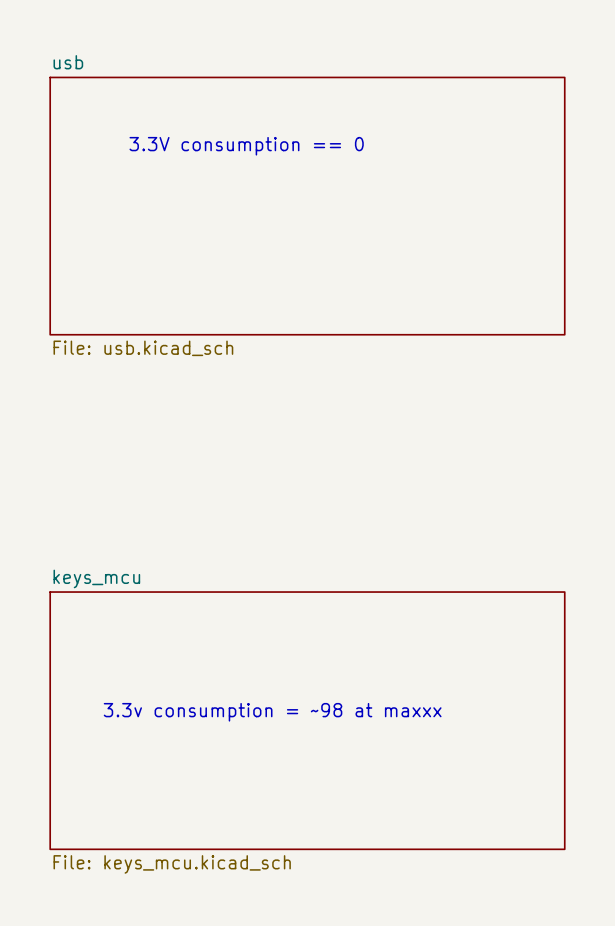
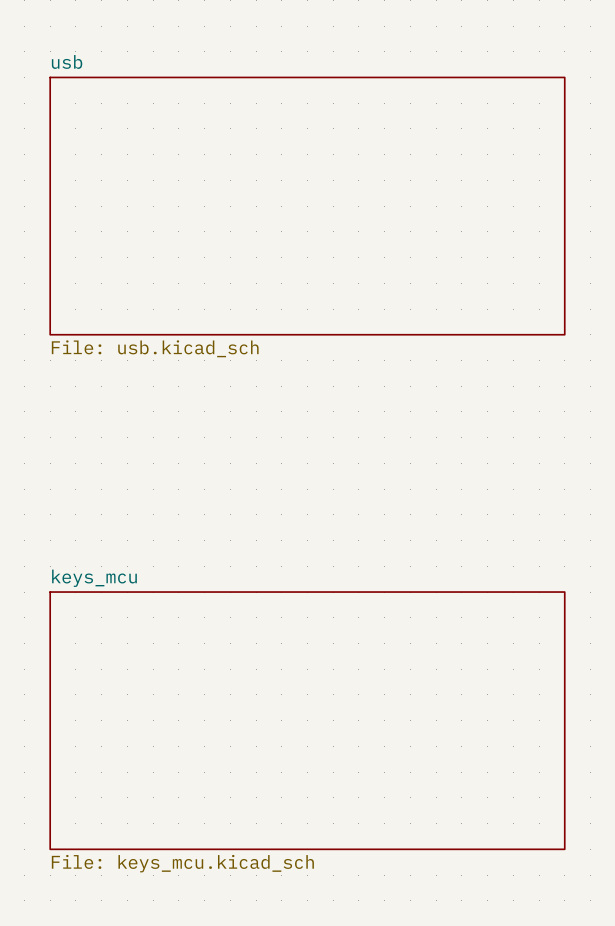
text: 3.3V consumption == 0 (246, 146) -> none
text: 3.3v consumption = ~98 at maxxx (272, 712) -> none

